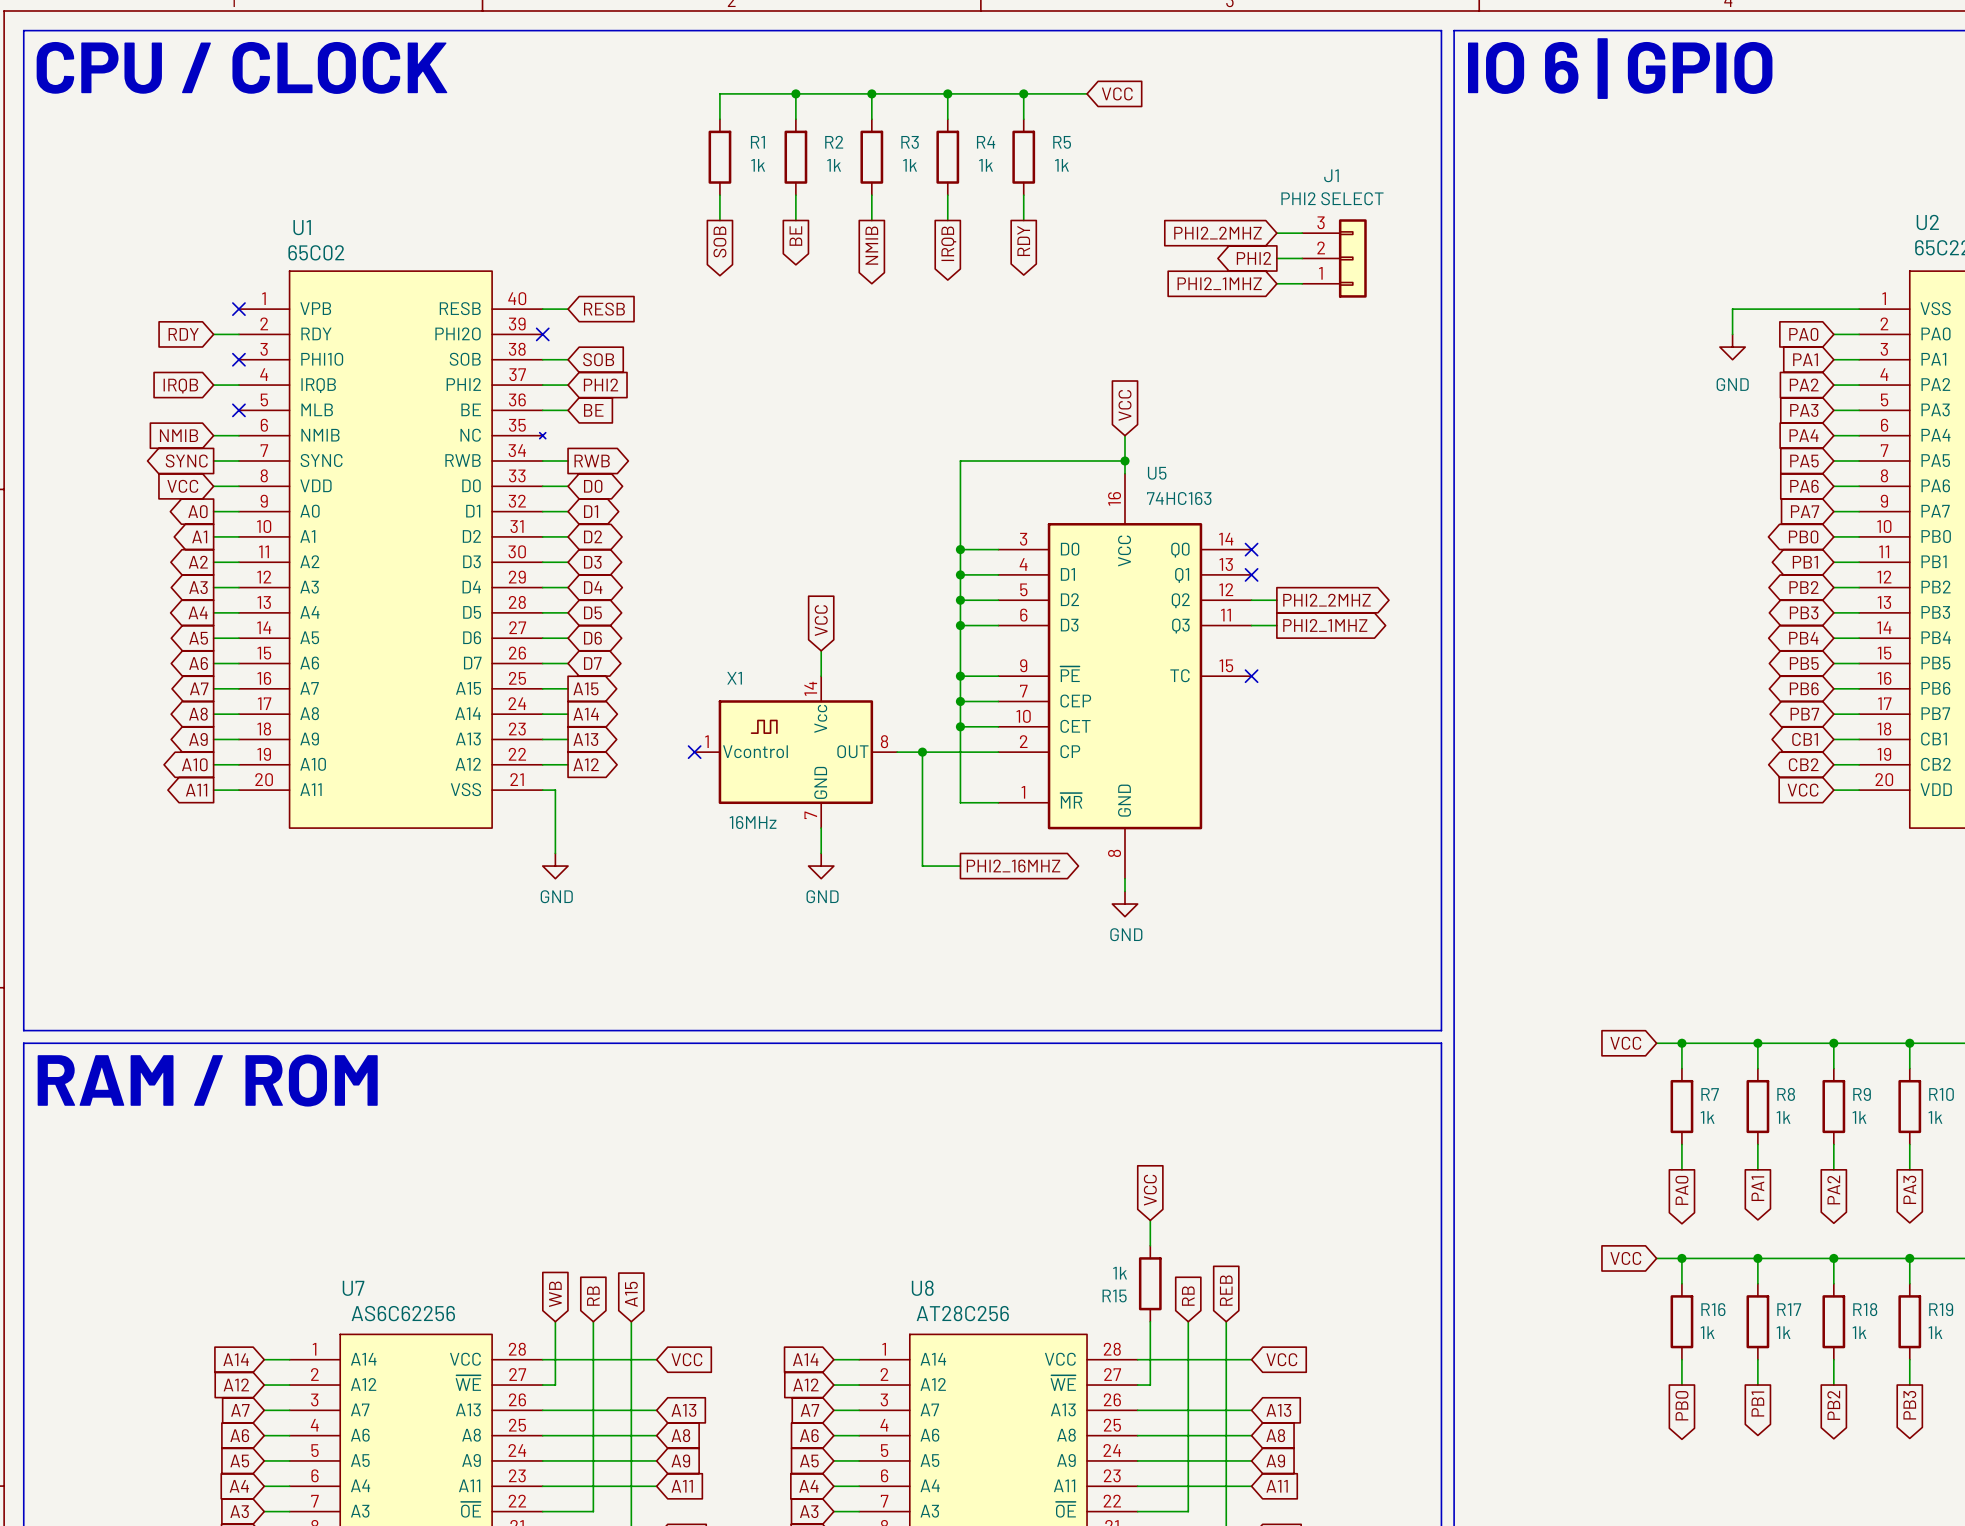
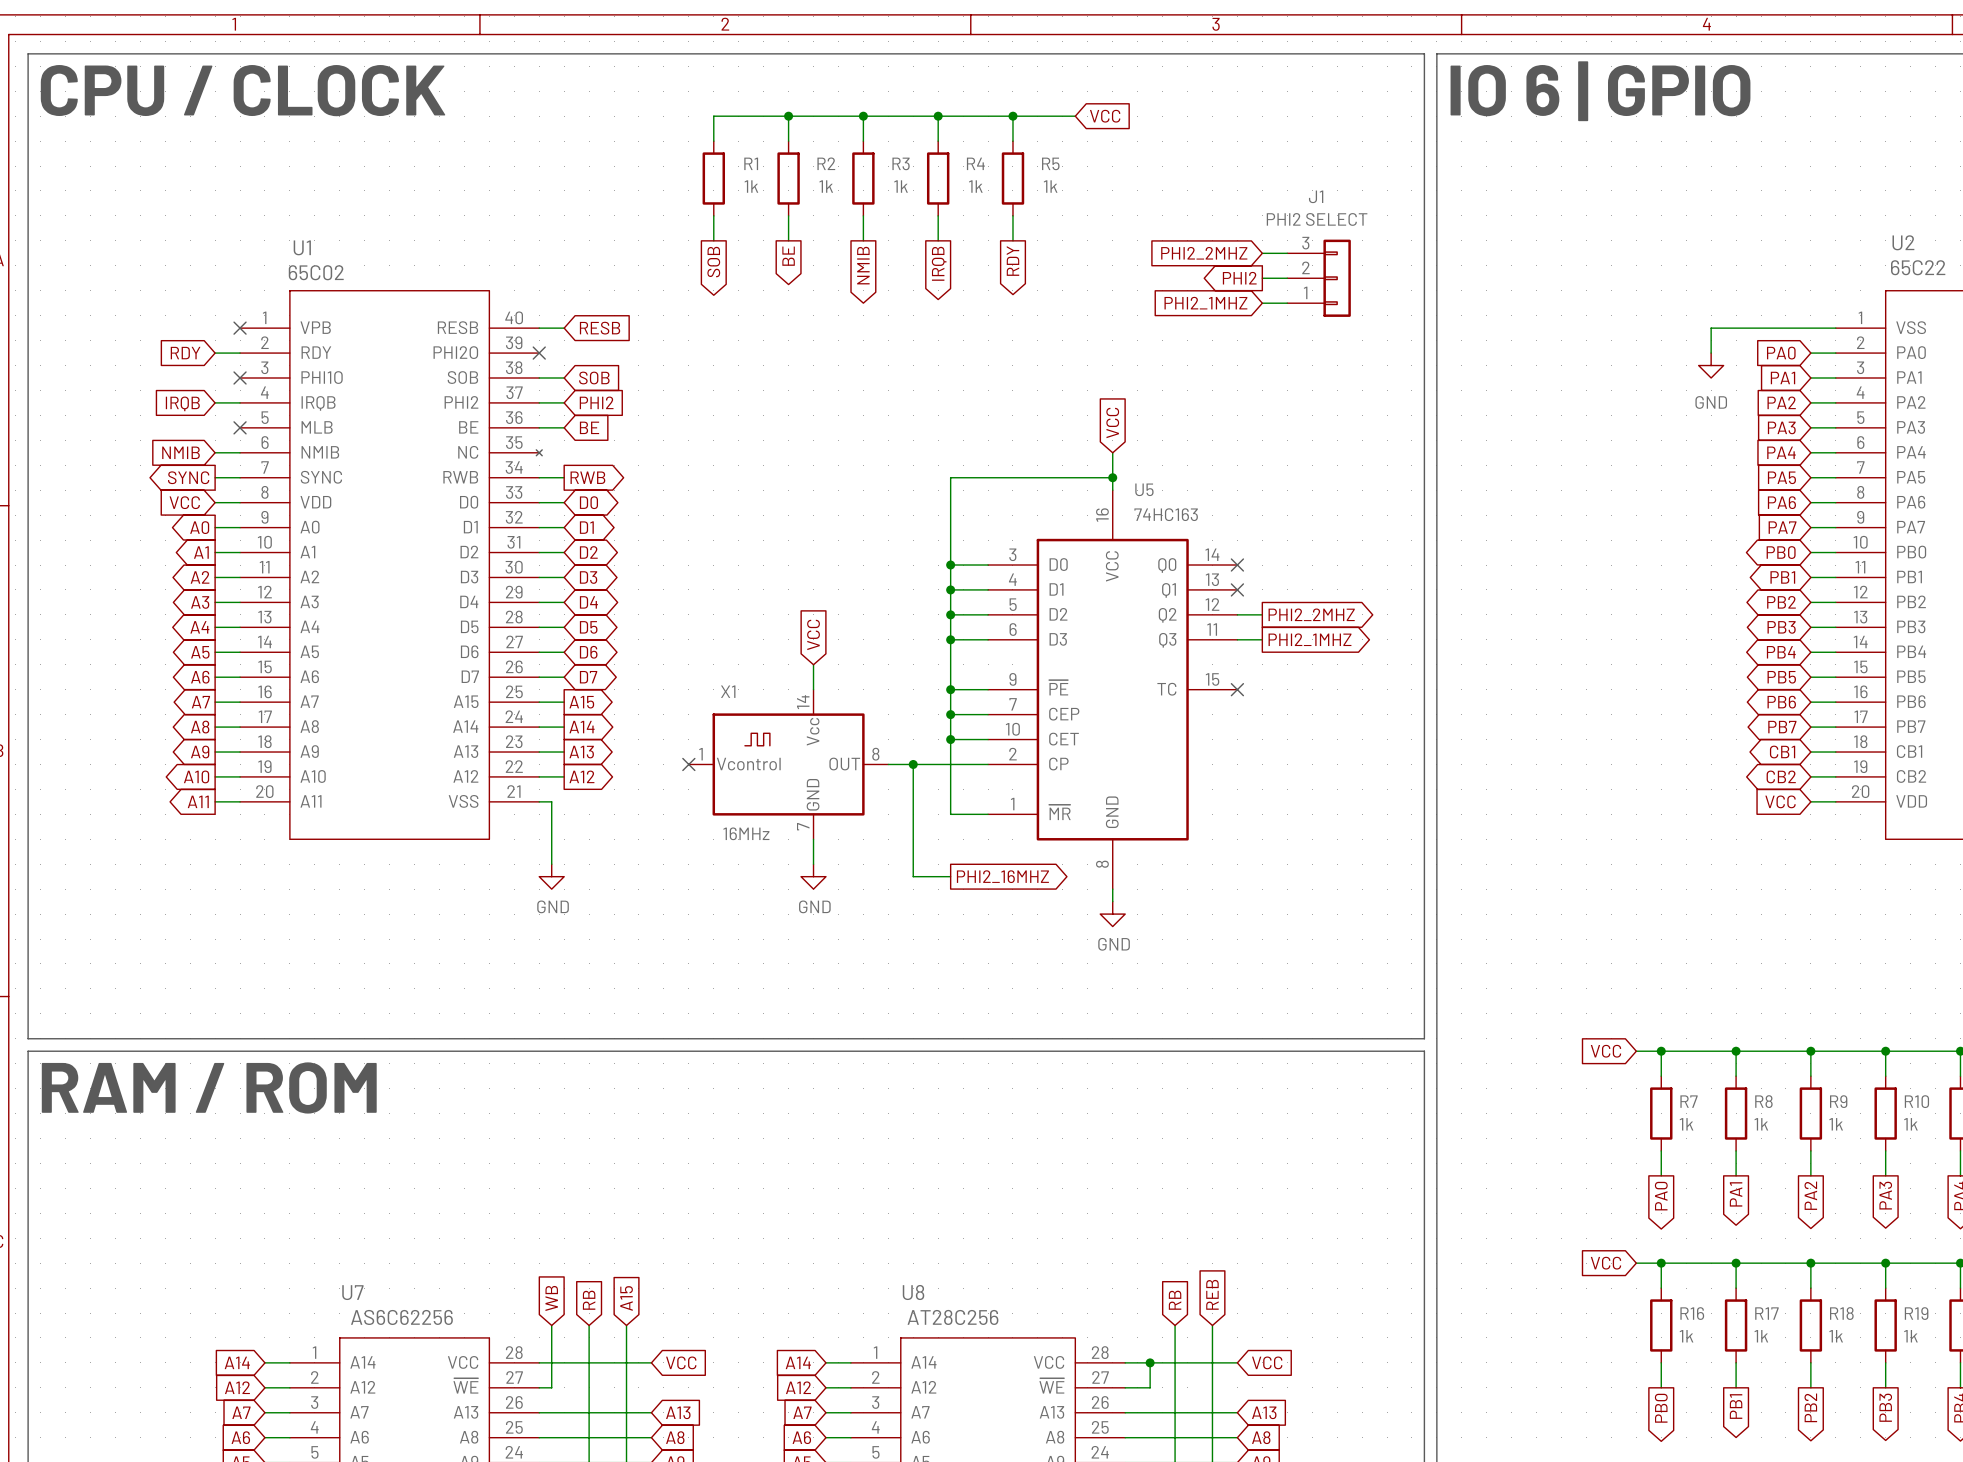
global label: VCC (1150, 1190) -> none
wire: (1150, 1220) (1150, 1245) -> none
R15: 1k (1150, 1283) -> none
wire: (1150, 1321) (1150, 1385) -> (1150, 1362) (1150, 1387) (1137, 1387)
junction: none -> (1150, 1362)

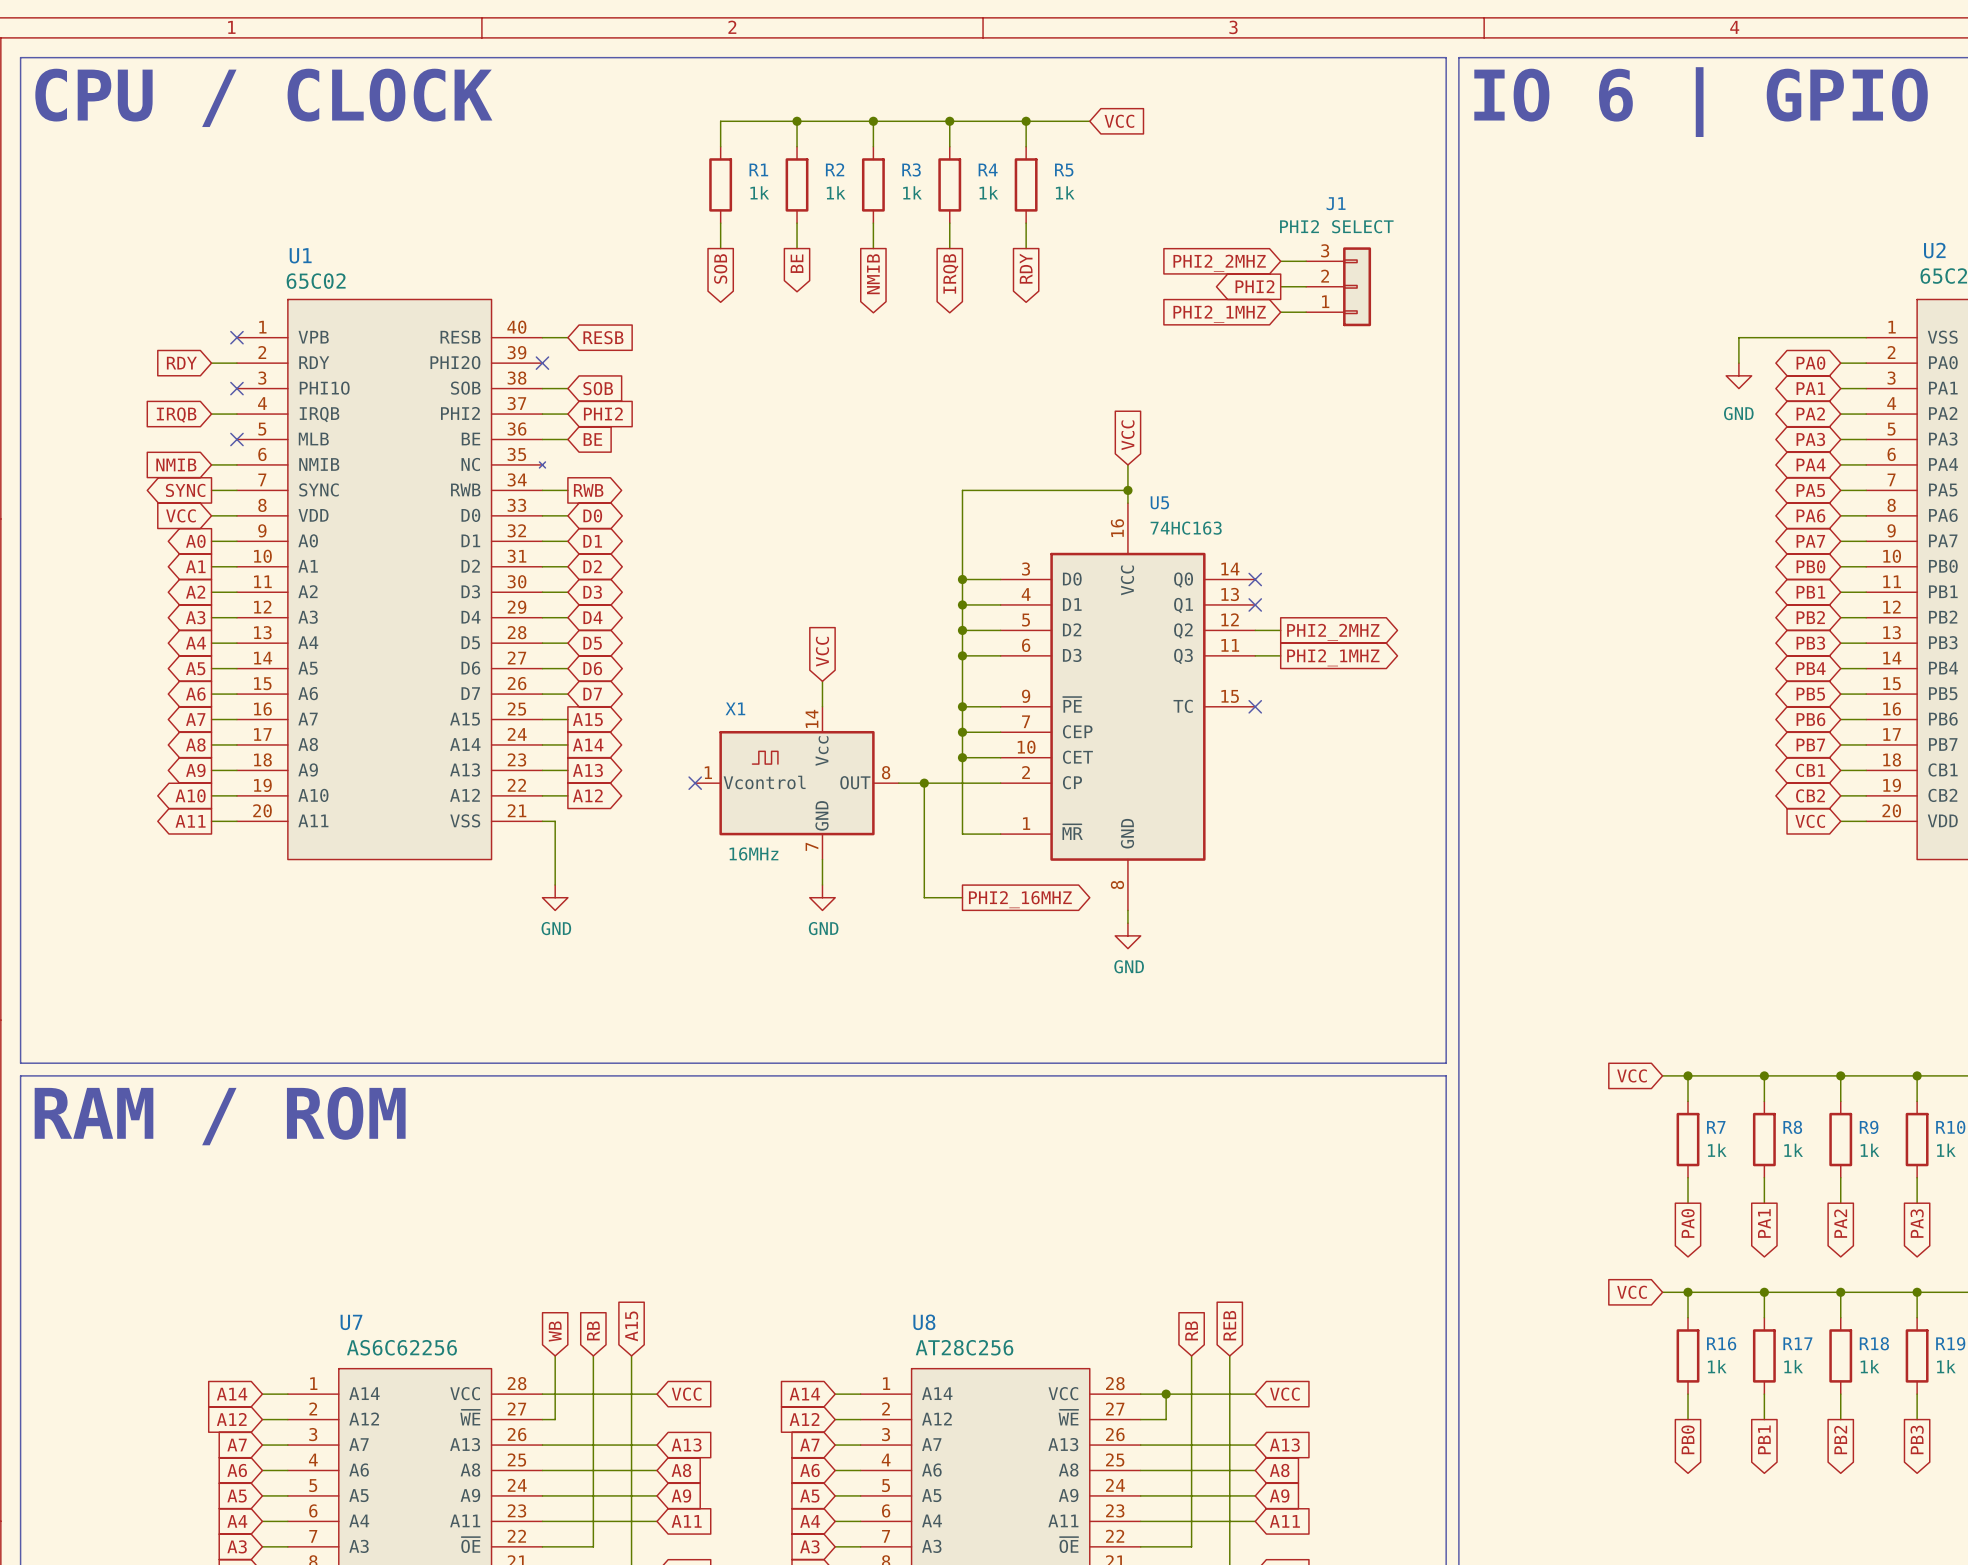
global label shape: input (1781, 353) -> bidirectional (1810, 363)
global label shape: input (1783, 377) -> bidirectional (1810, 388)
global label shape: input (1781, 402) -> bidirectional (1810, 413)
global label shape: input (1781, 427) -> bidirectional (1810, 439)
global label shape: input (1781, 452) -> bidirectional (1811, 464)
global label shape: input (1781, 477) -> bidirectional (1810, 490)
global label shape: input (1781, 502) -> bidirectional (1810, 515)
global label shape: input (1782, 527) -> bidirectional (1810, 541)

